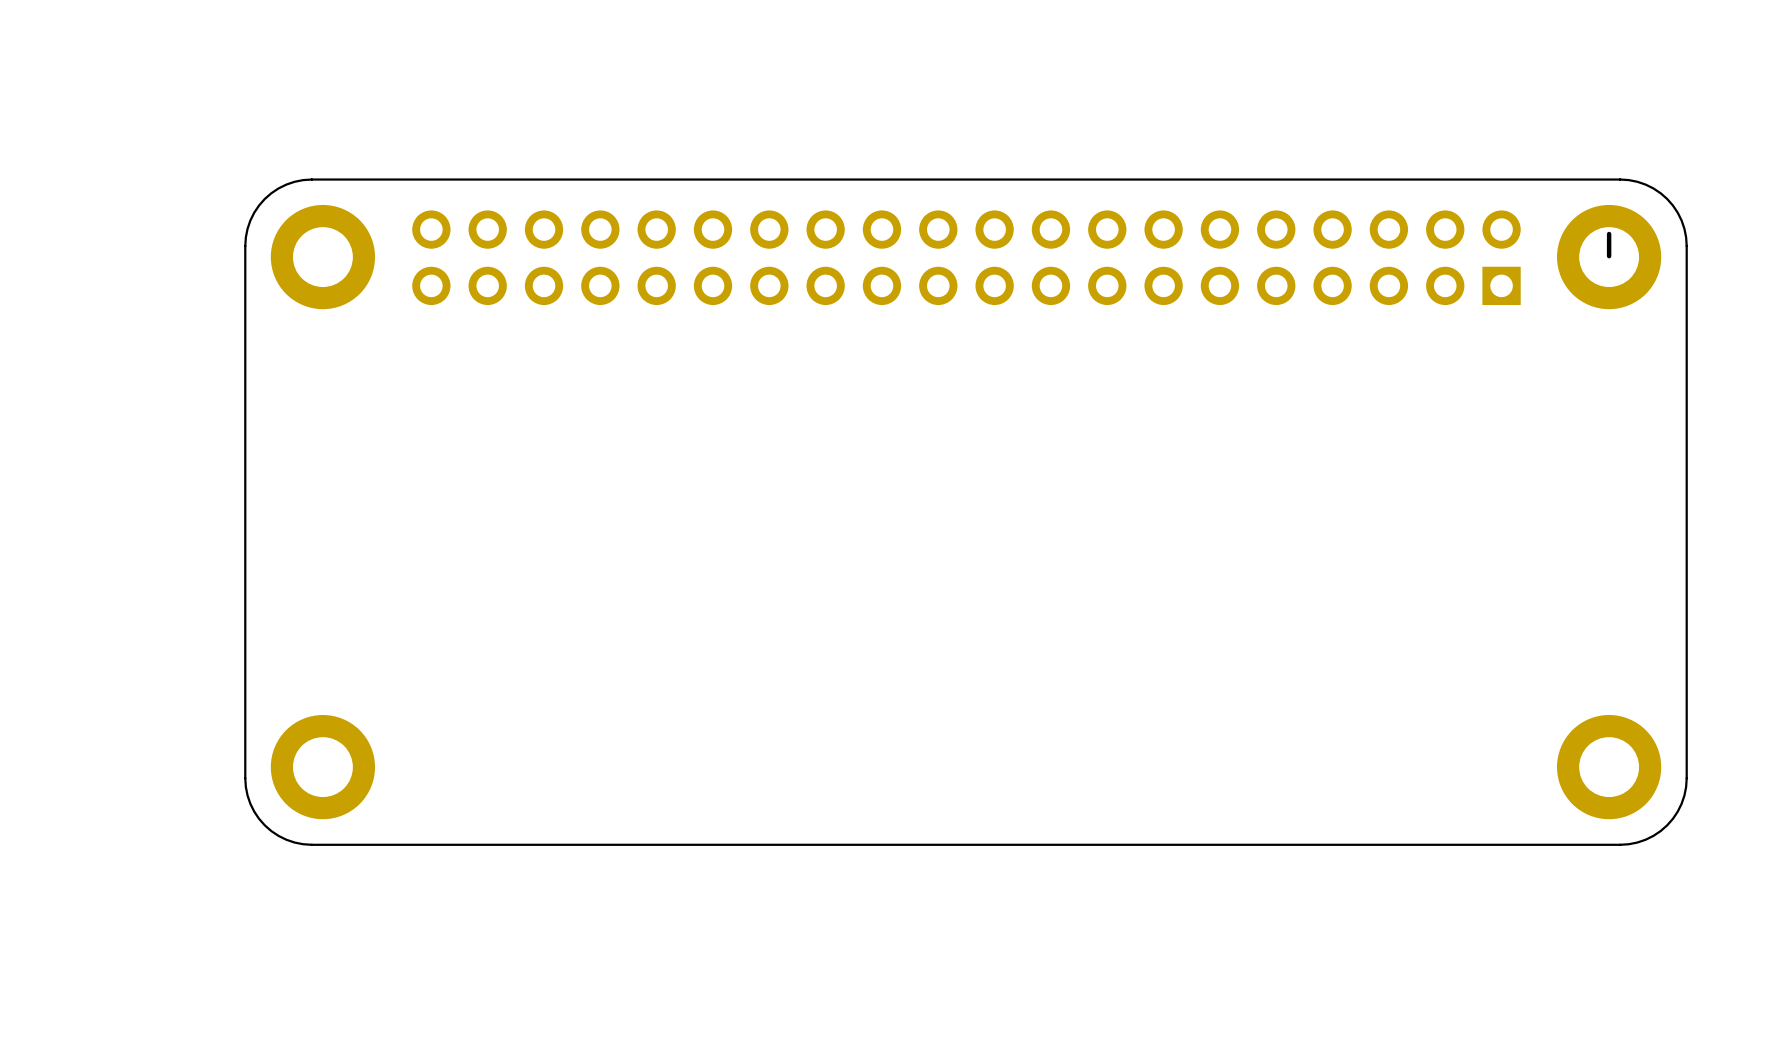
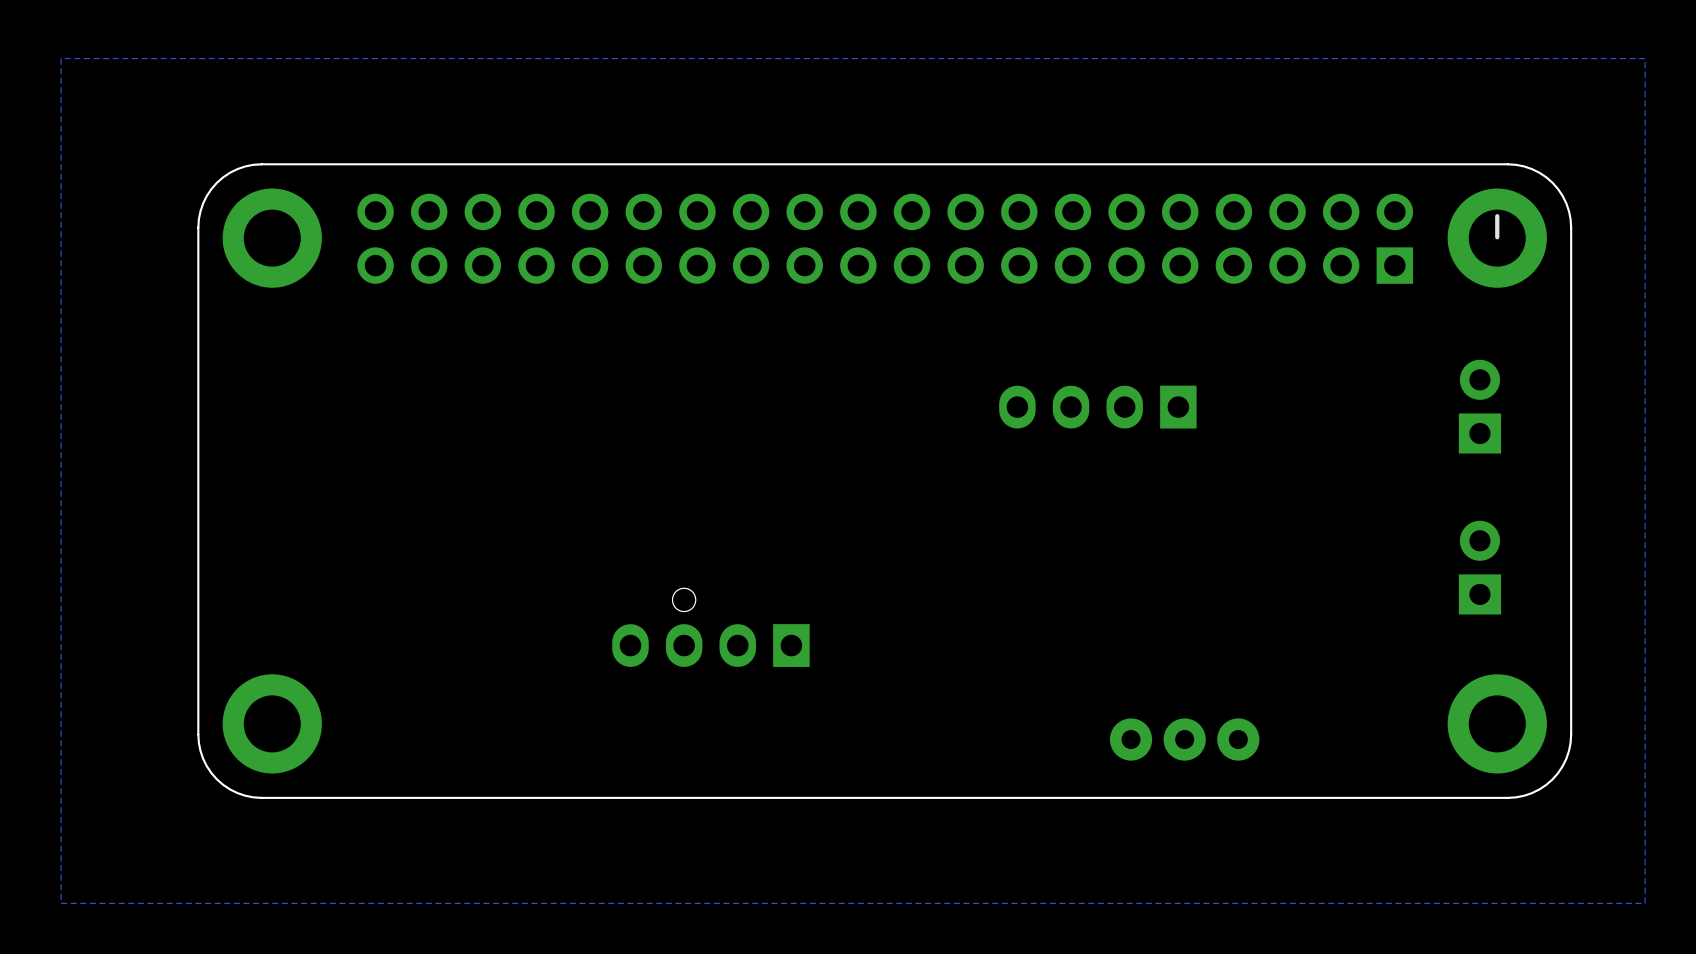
zone outline: none -> (1645, 58) (1645, 903) (61, 903) (61, 58) (1645, 58)
part: none -> (1097, 407)
part: none -> (1479, 406)
part: none -> (1479, 567)
part: none -> (710, 627)
part: none -> (1184, 739)

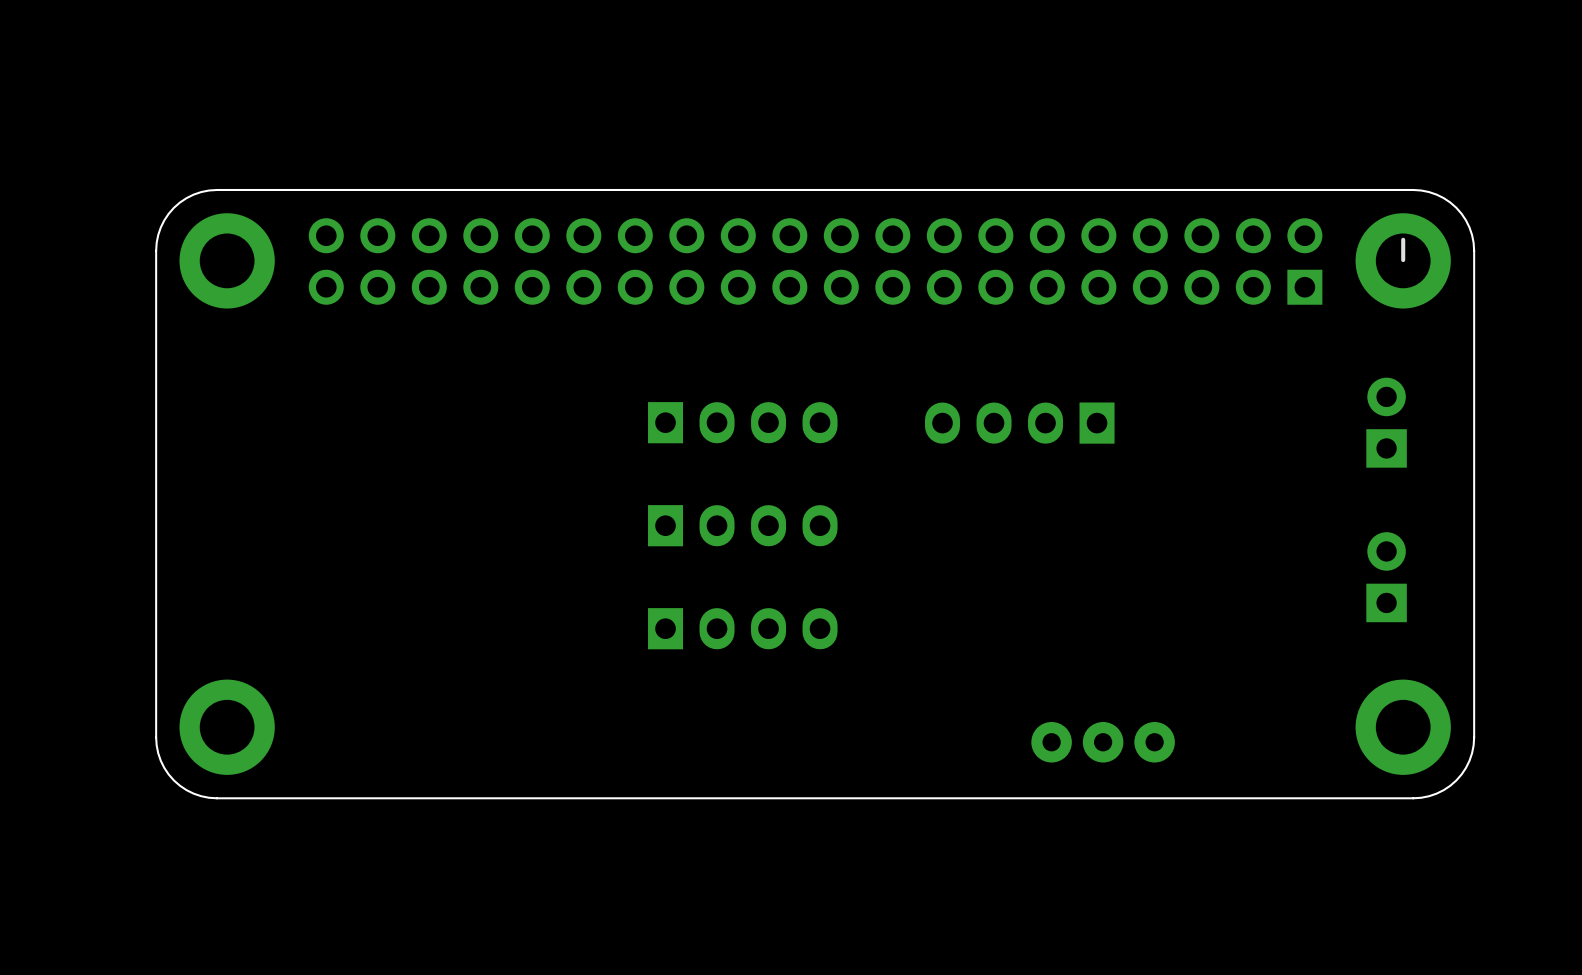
zone outline: (1645, 58) (1645, 903) (61, 903) (61, 58) (1645, 58) -> none
part: none -> (742, 422)
part: none -> (742, 525)
part: none -> (742, 628)
part: (710, 627) -> none

